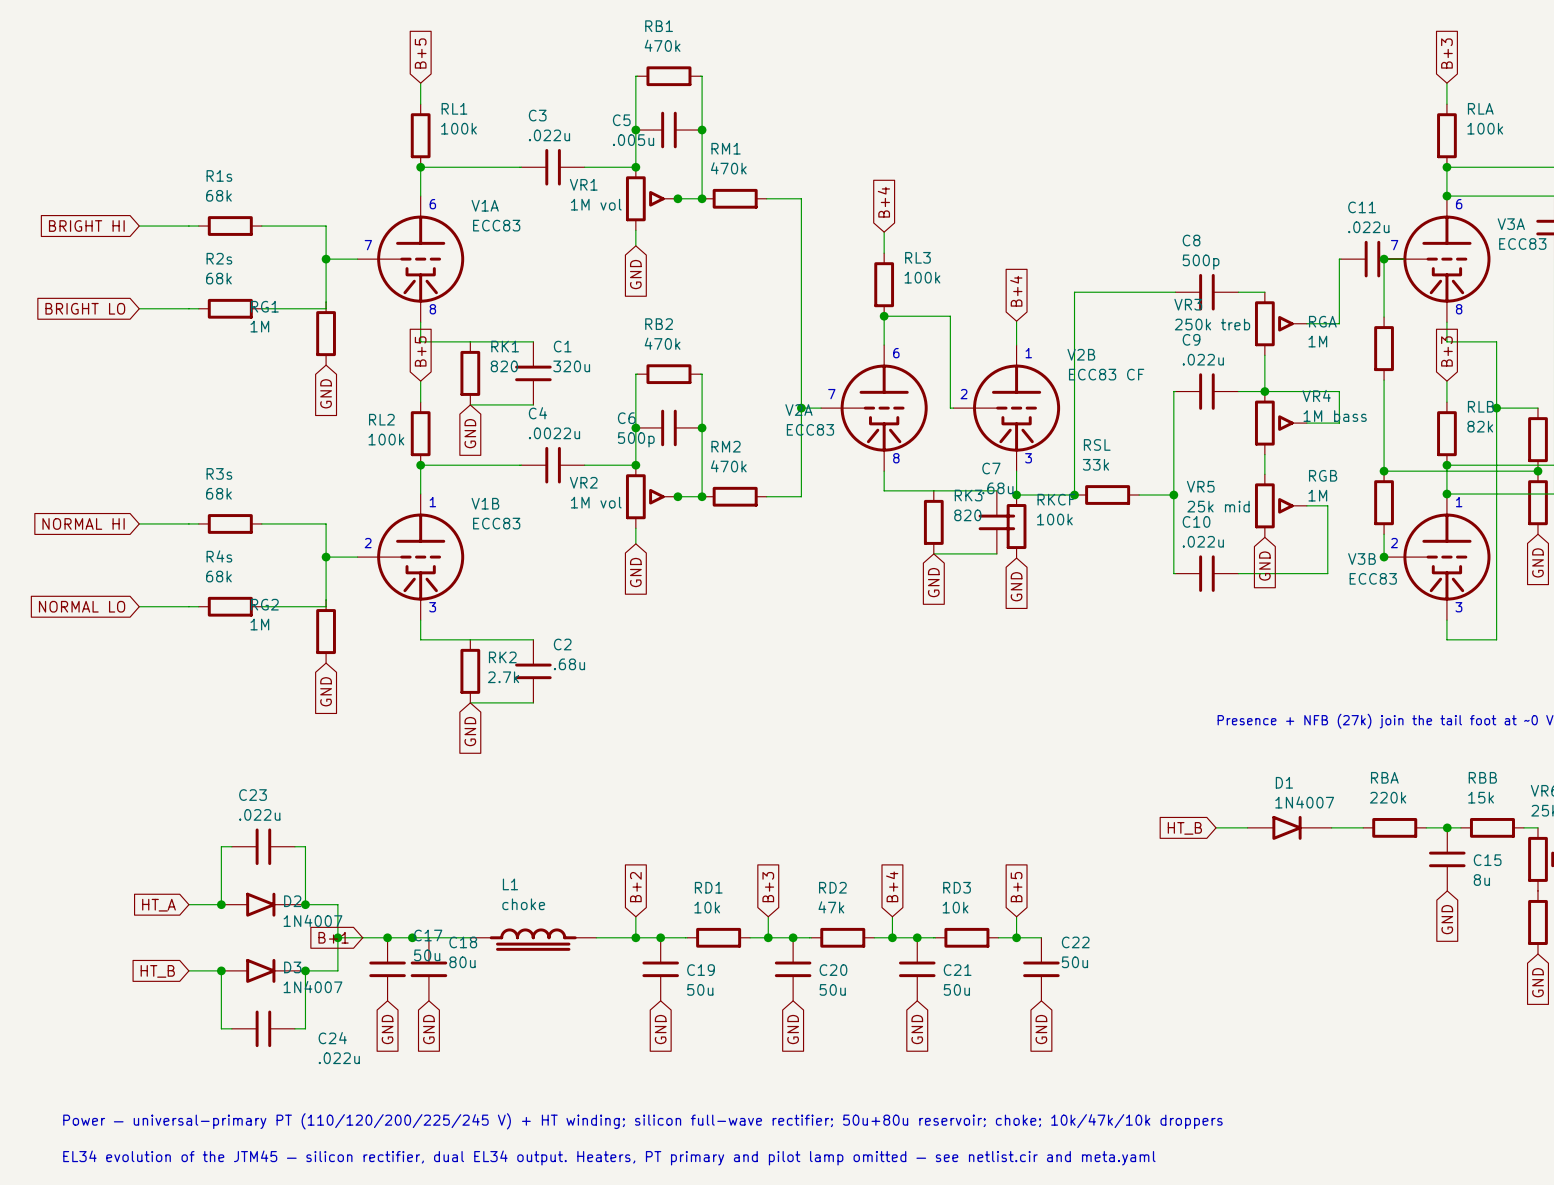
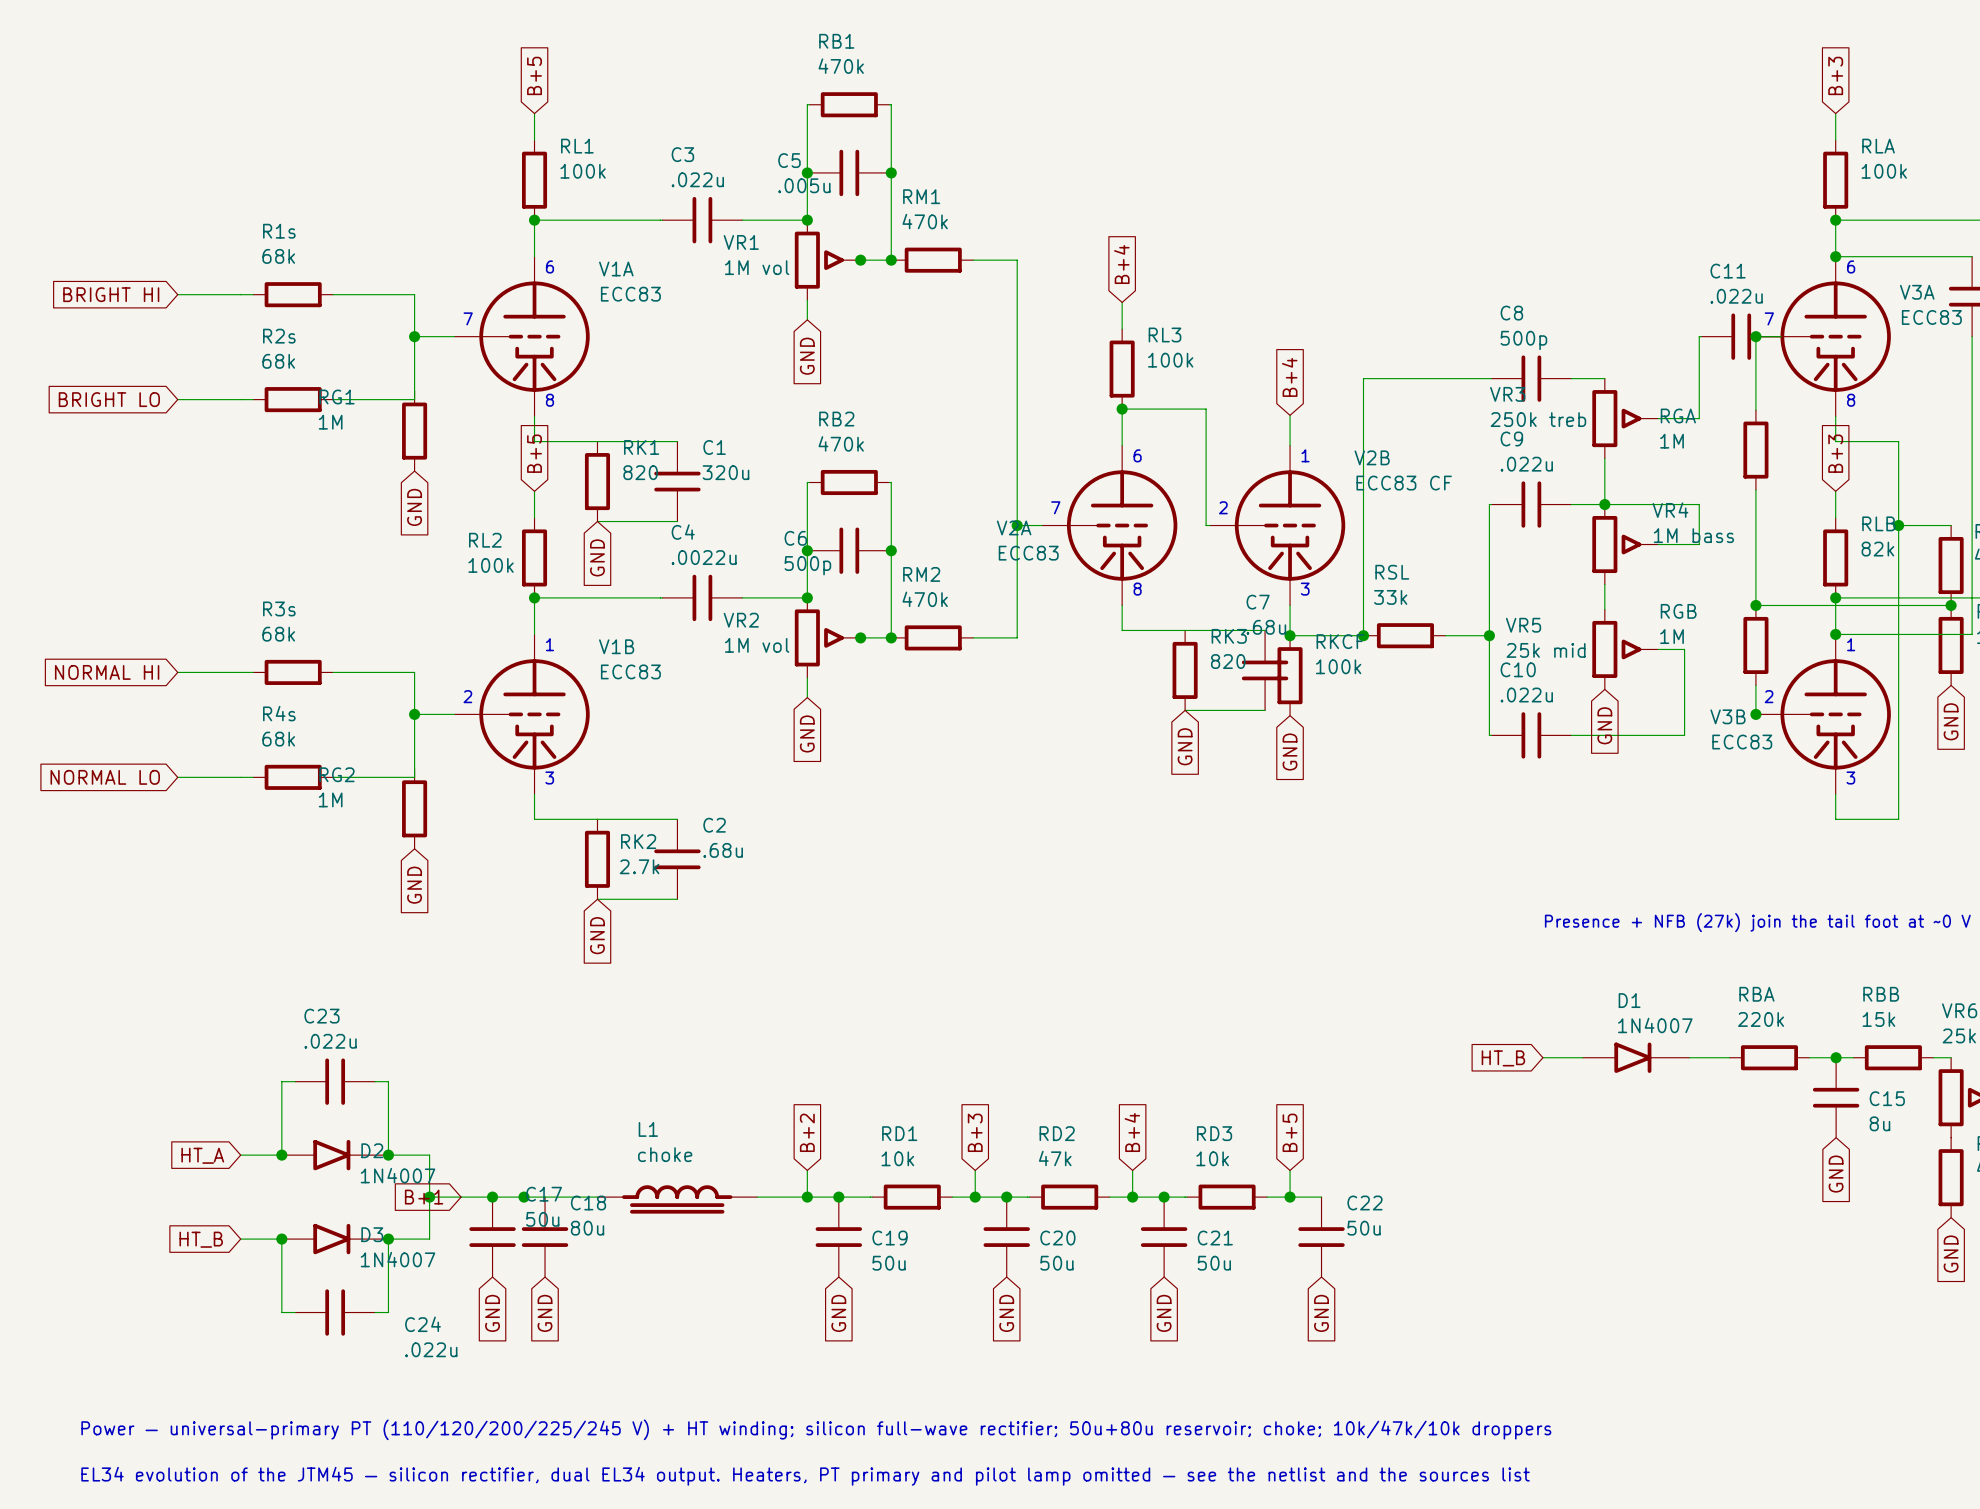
text: EL34 evolution of the JTM45 — silicon rectifier, dual EL34 output. Heaters, PT primary and pilot lamp omitted — see netlist.cir and meta.yaml (609, 1157) -> EL34 evolution of the JTM45 — silicon rectifier, dual EL34 output. Heaters, PT primary and pilot lamp omitted — see the netlist and the sources list (805, 1476)

